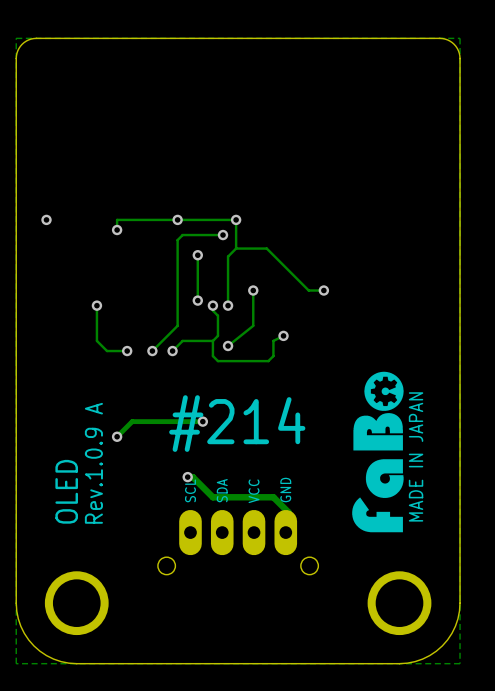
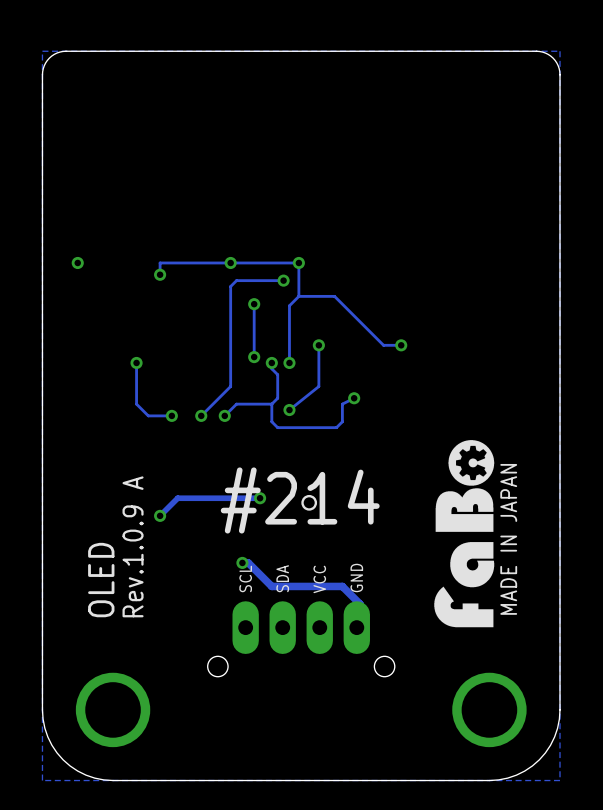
part: none -> (309, 502)

